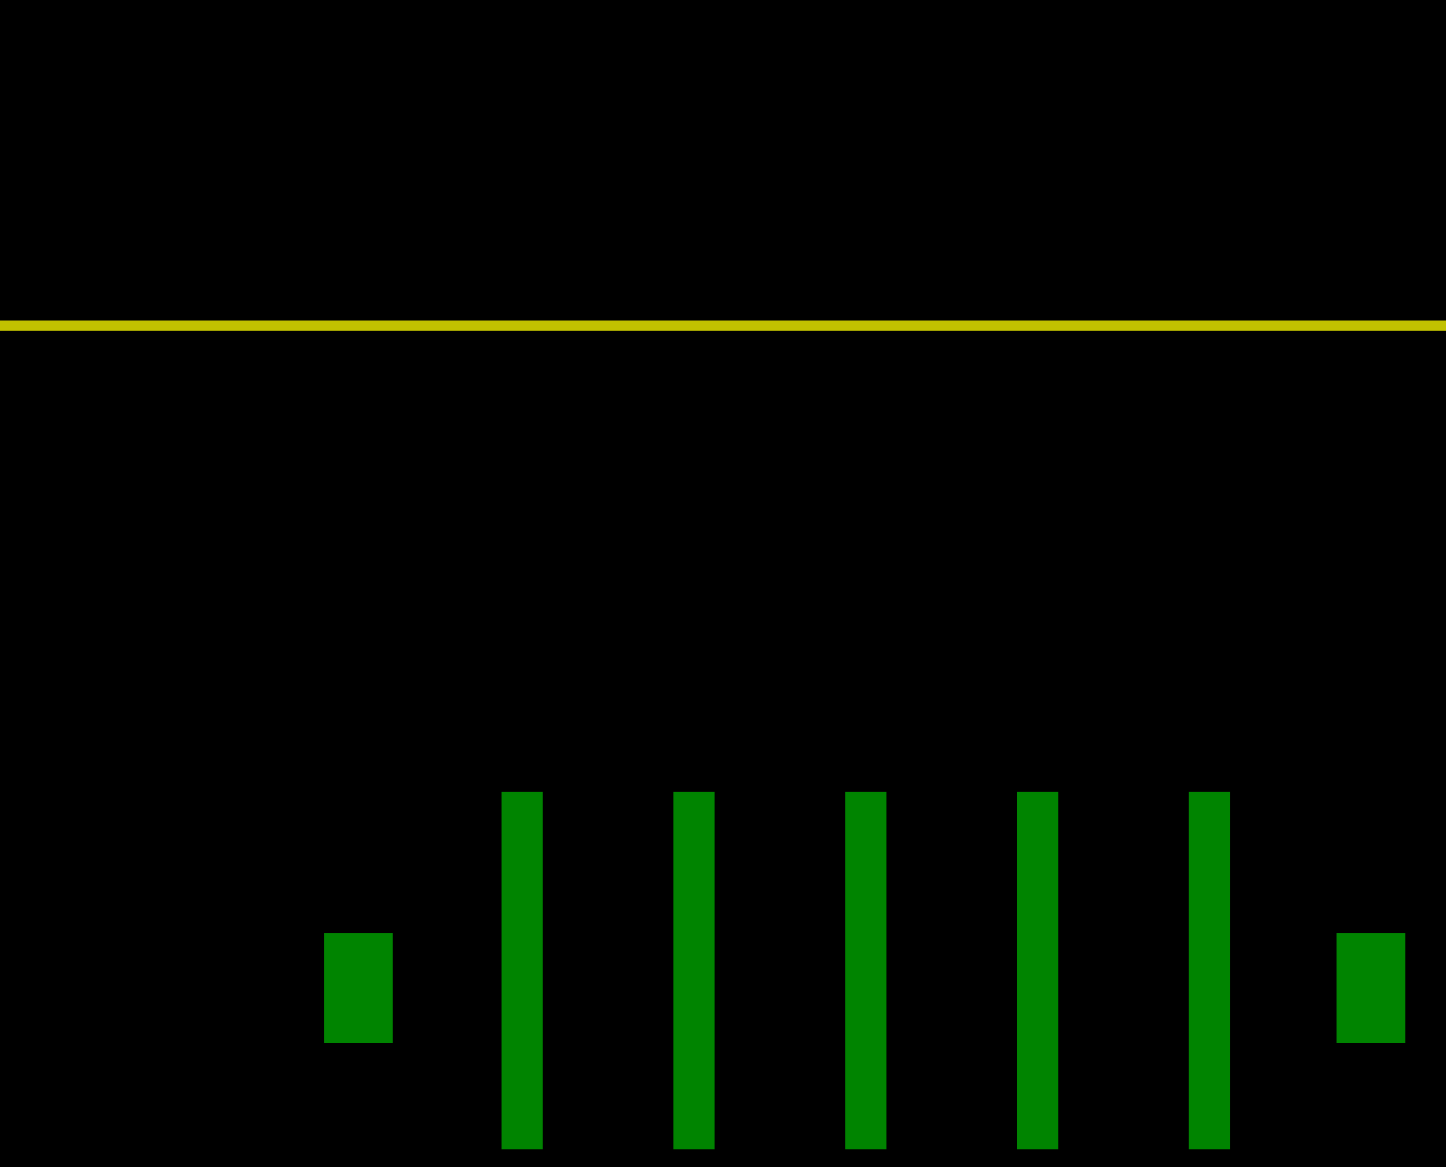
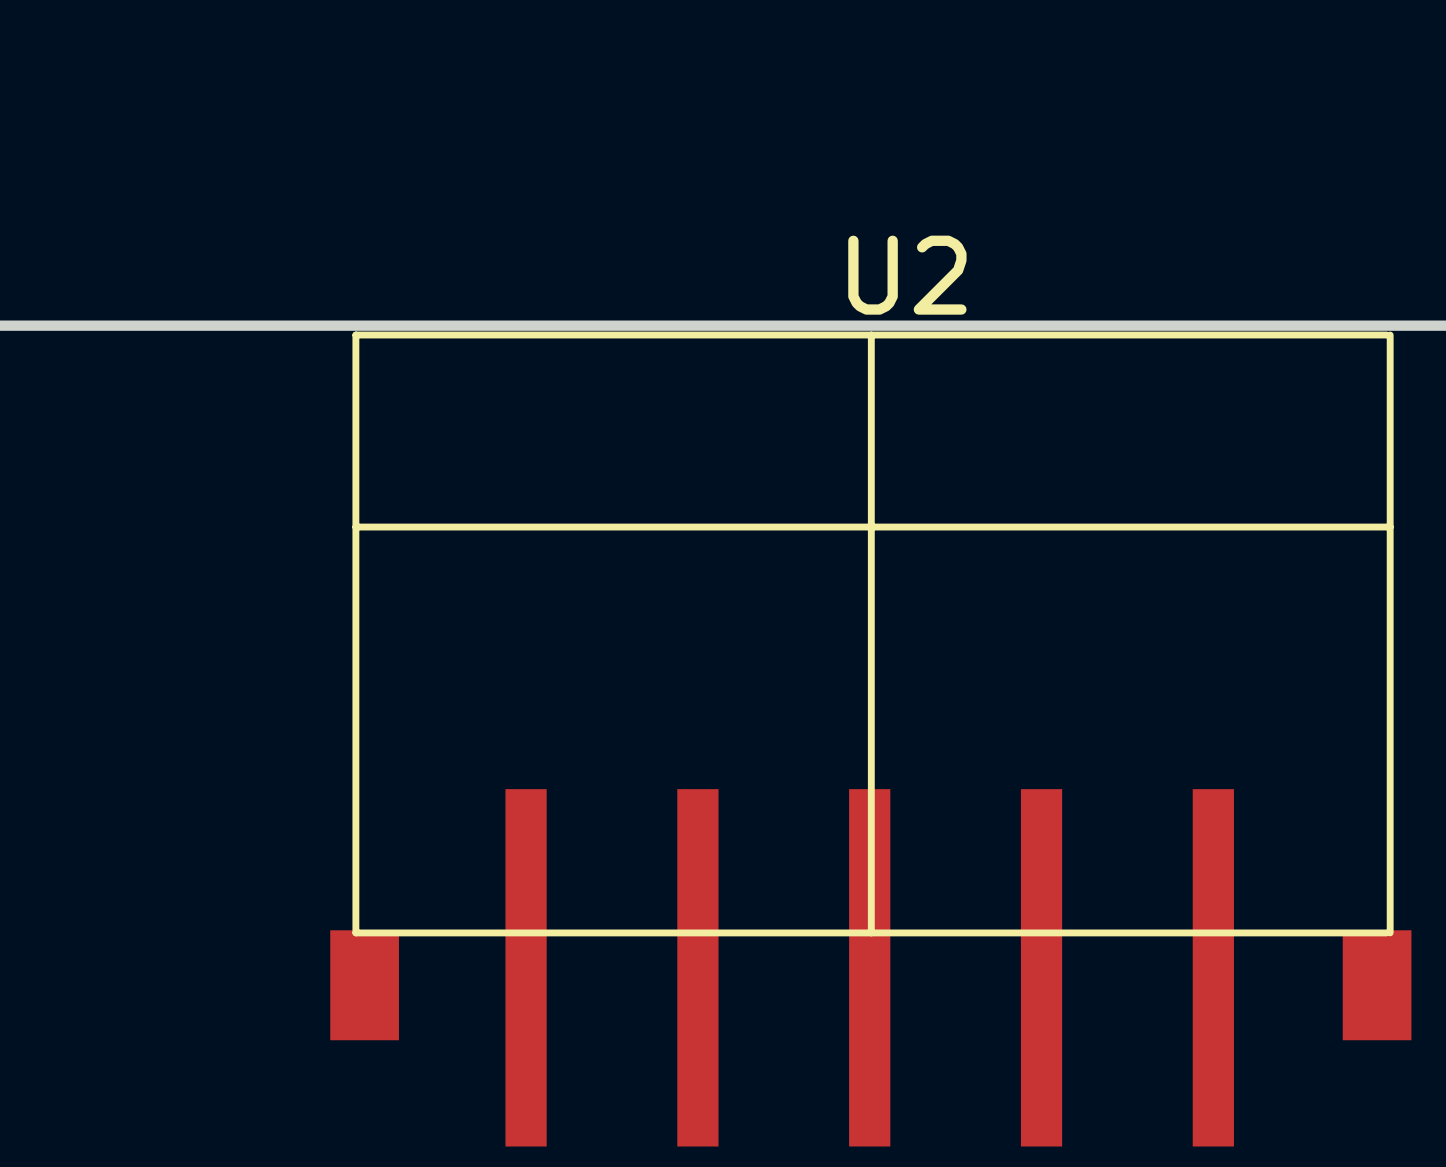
U2 side: bottom (864, 970) -> top (870, 739)

